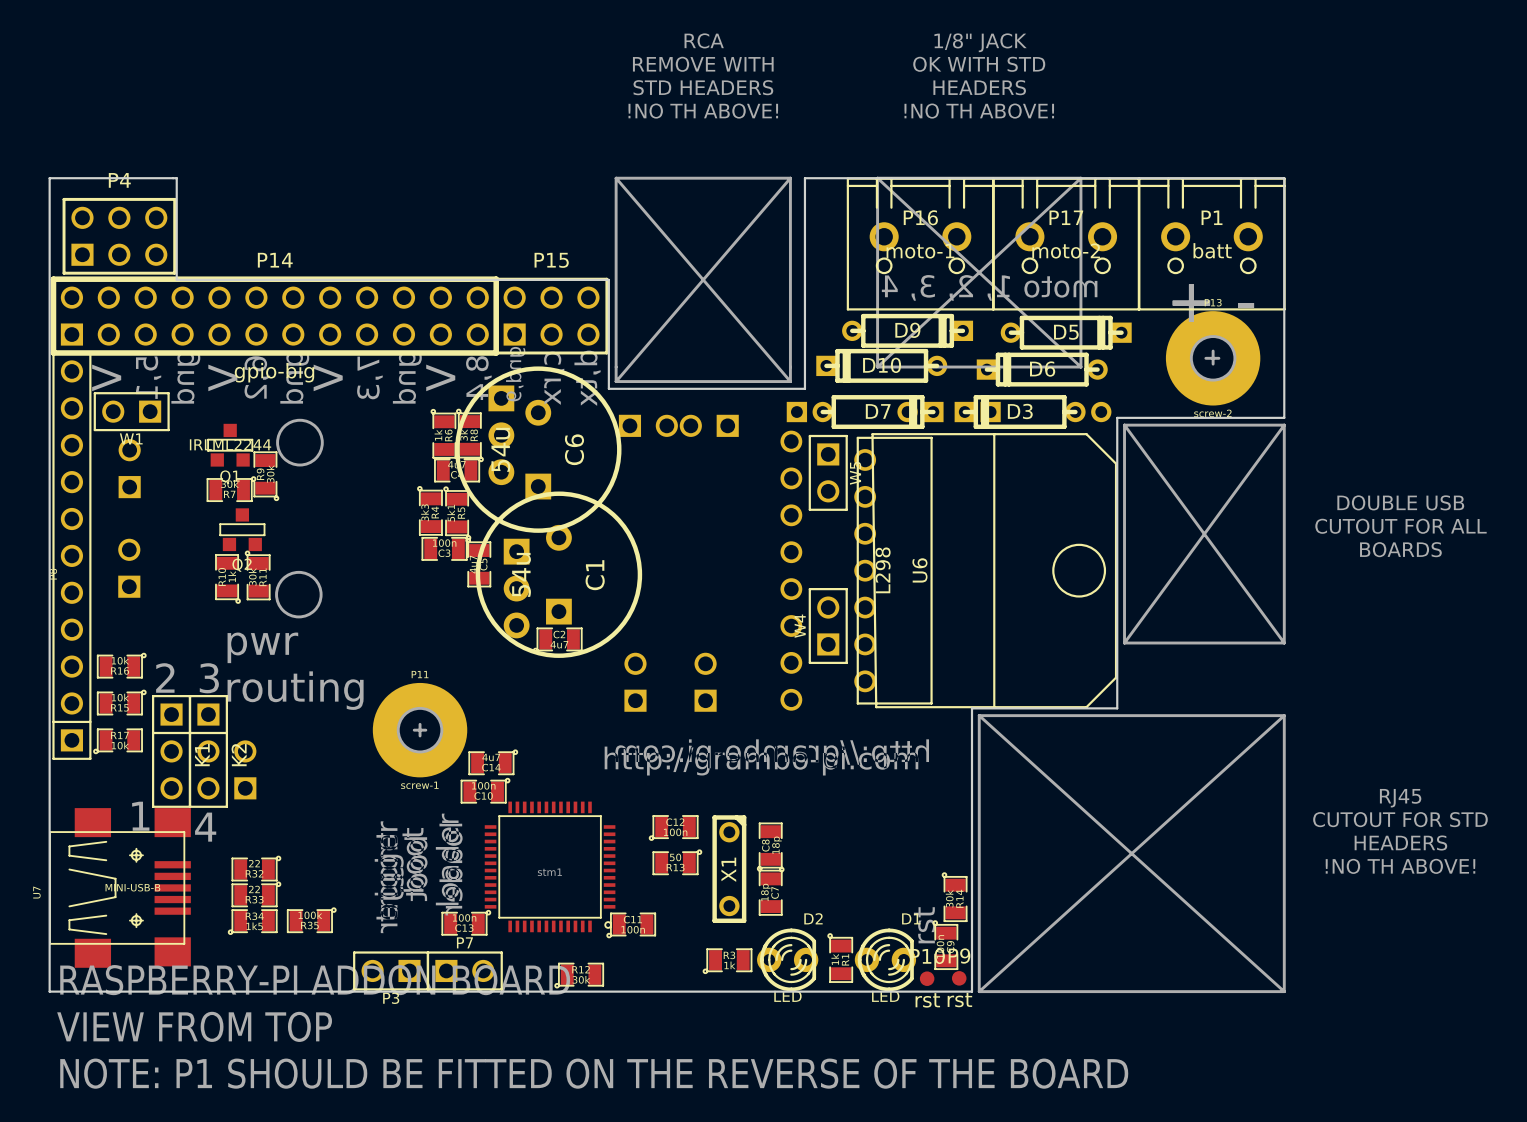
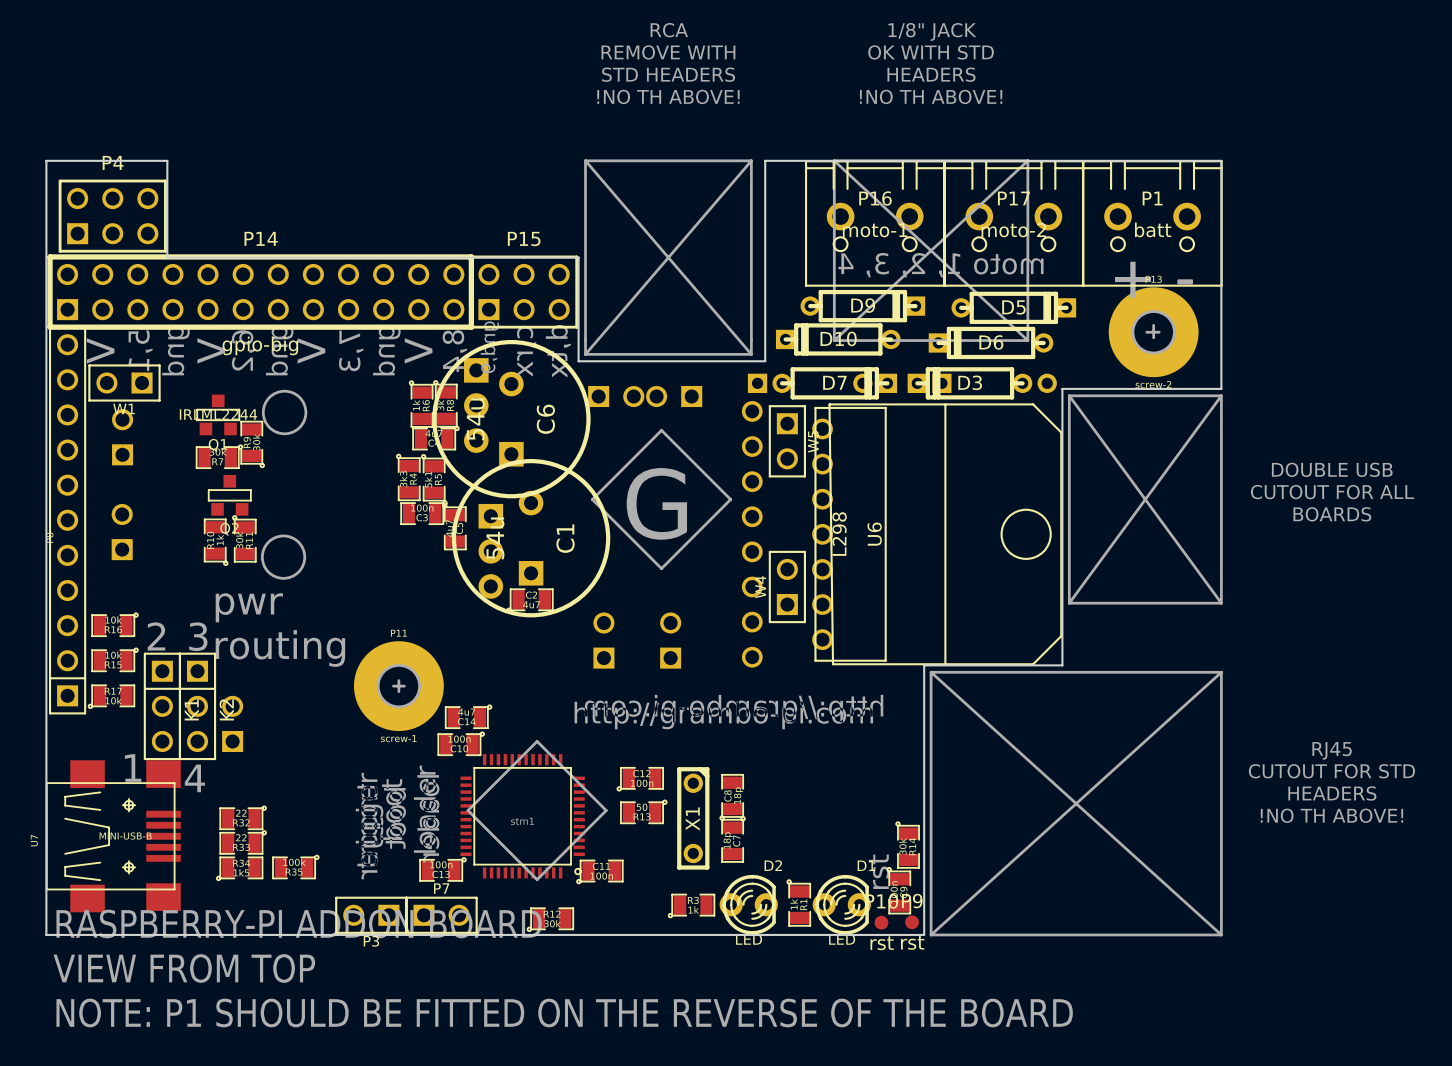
line: none -> (661, 430) (730, 499) (661, 568) (592, 499) (661, 430)
text: none -> G (656, 503)
line: none -> (537, 741) (606, 810) (537, 879) (468, 810) (537, 741)

